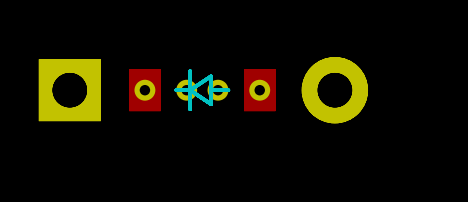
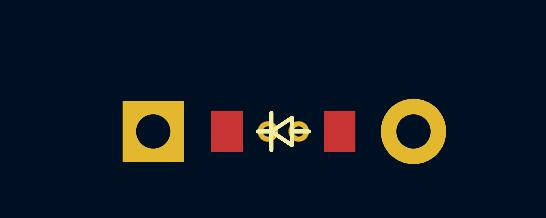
part: (202, 90) -> none

